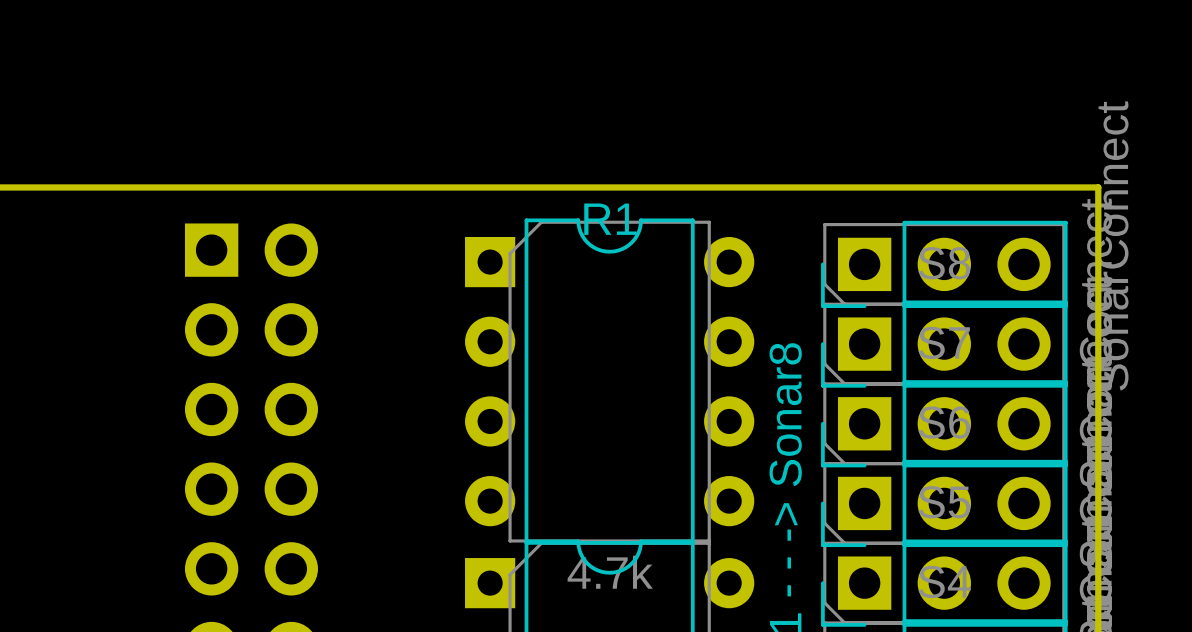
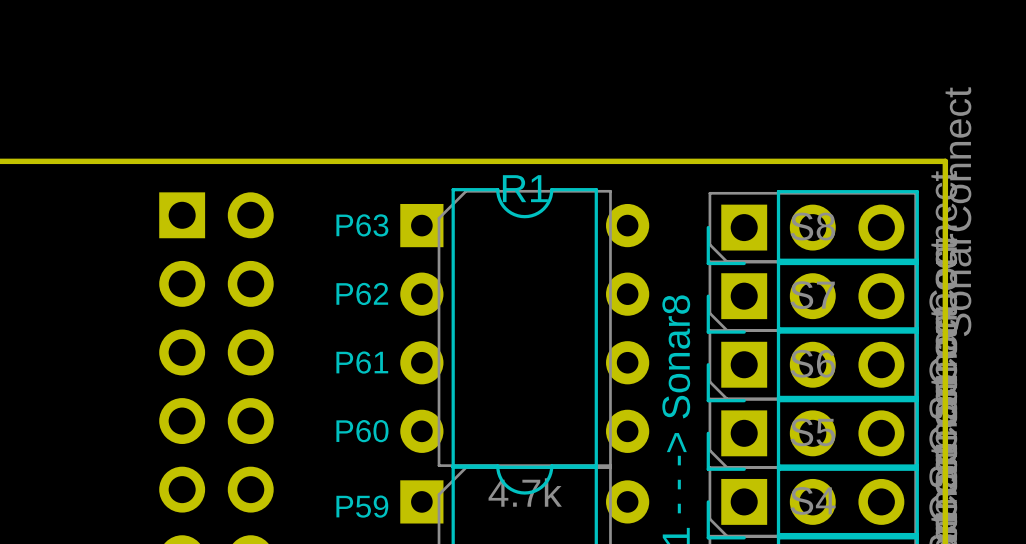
text: none -> P63 (362, 225)
text: none -> P62 (362, 293)
text: none -> P61 (362, 362)
text: none -> P60 (362, 431)
text: none -> P59 (362, 506)

